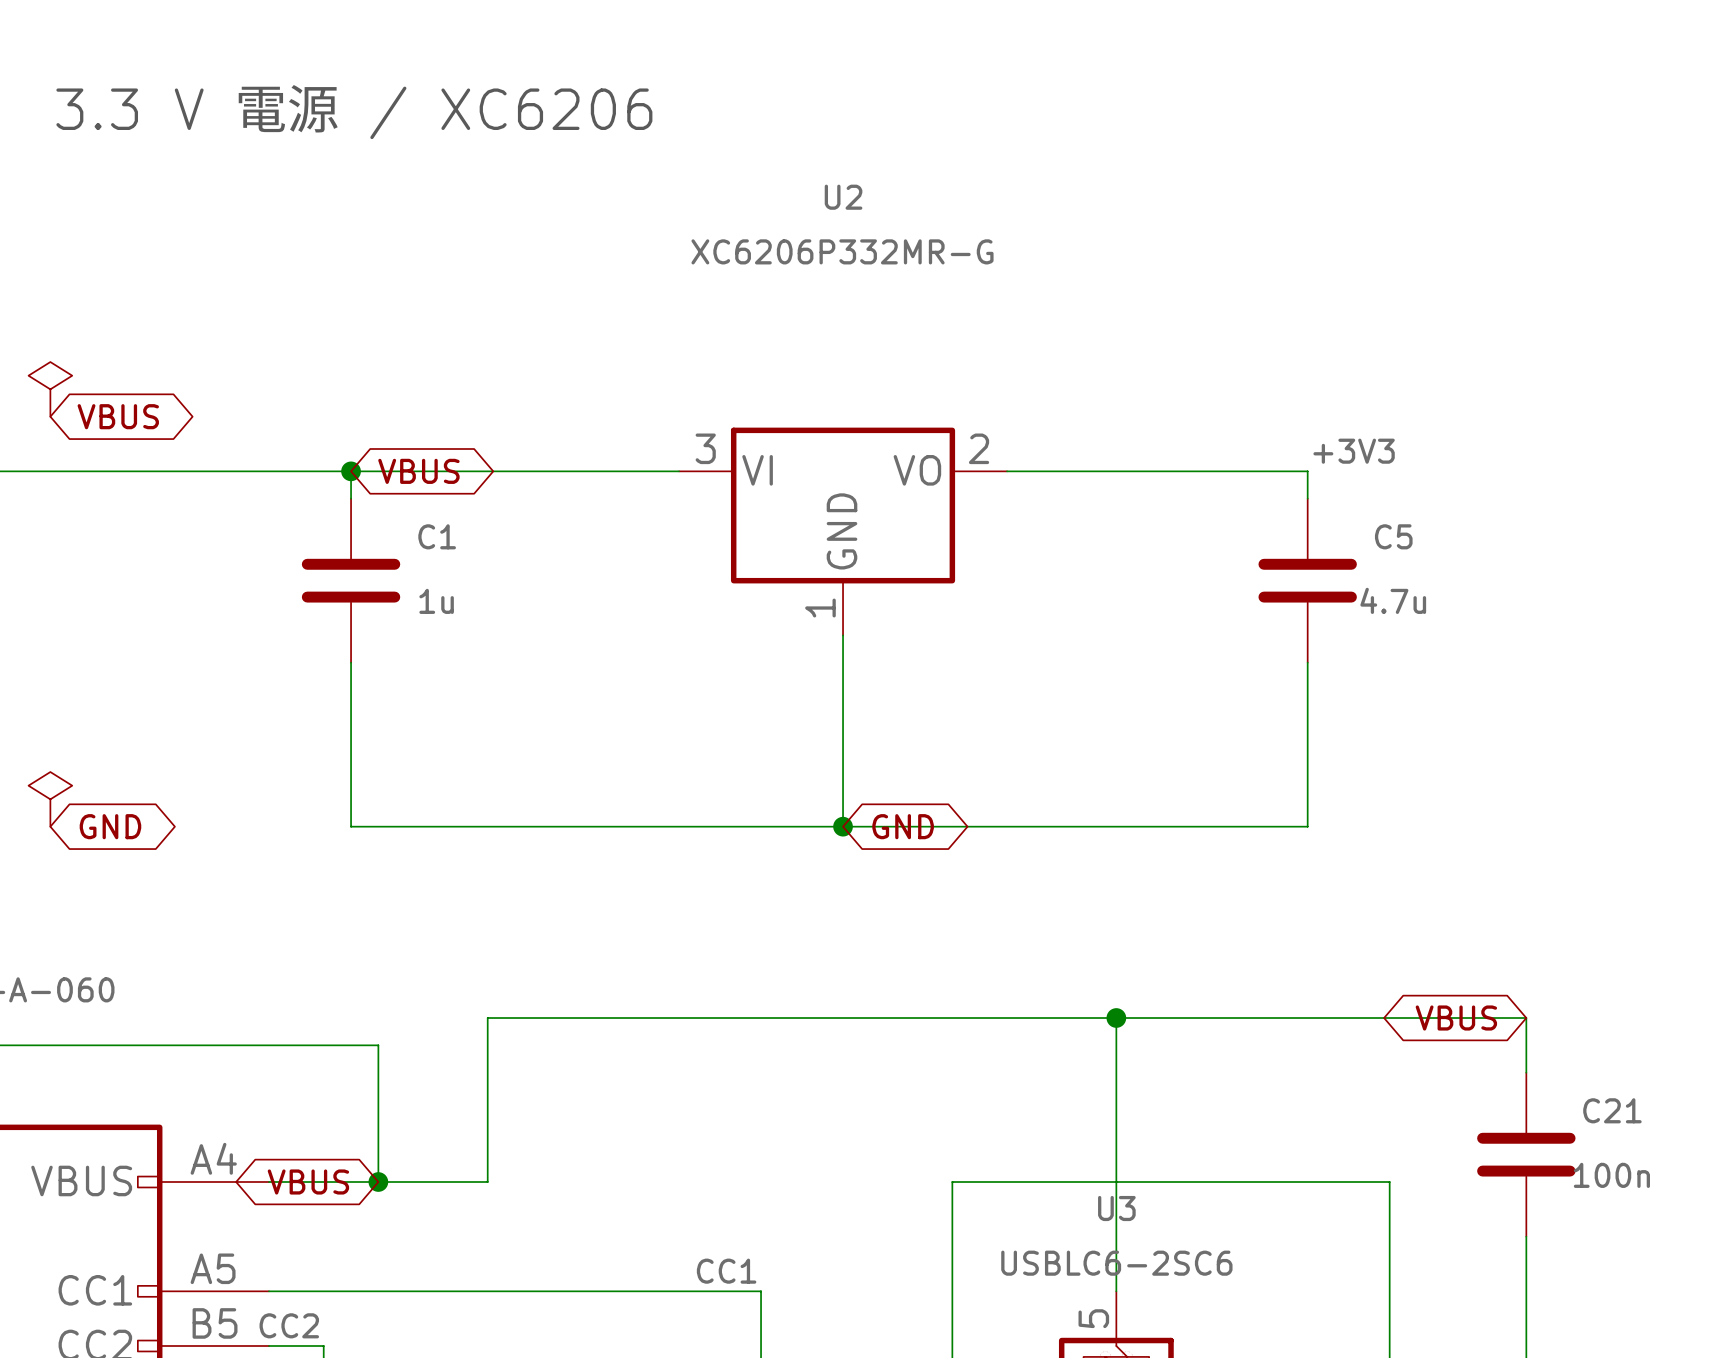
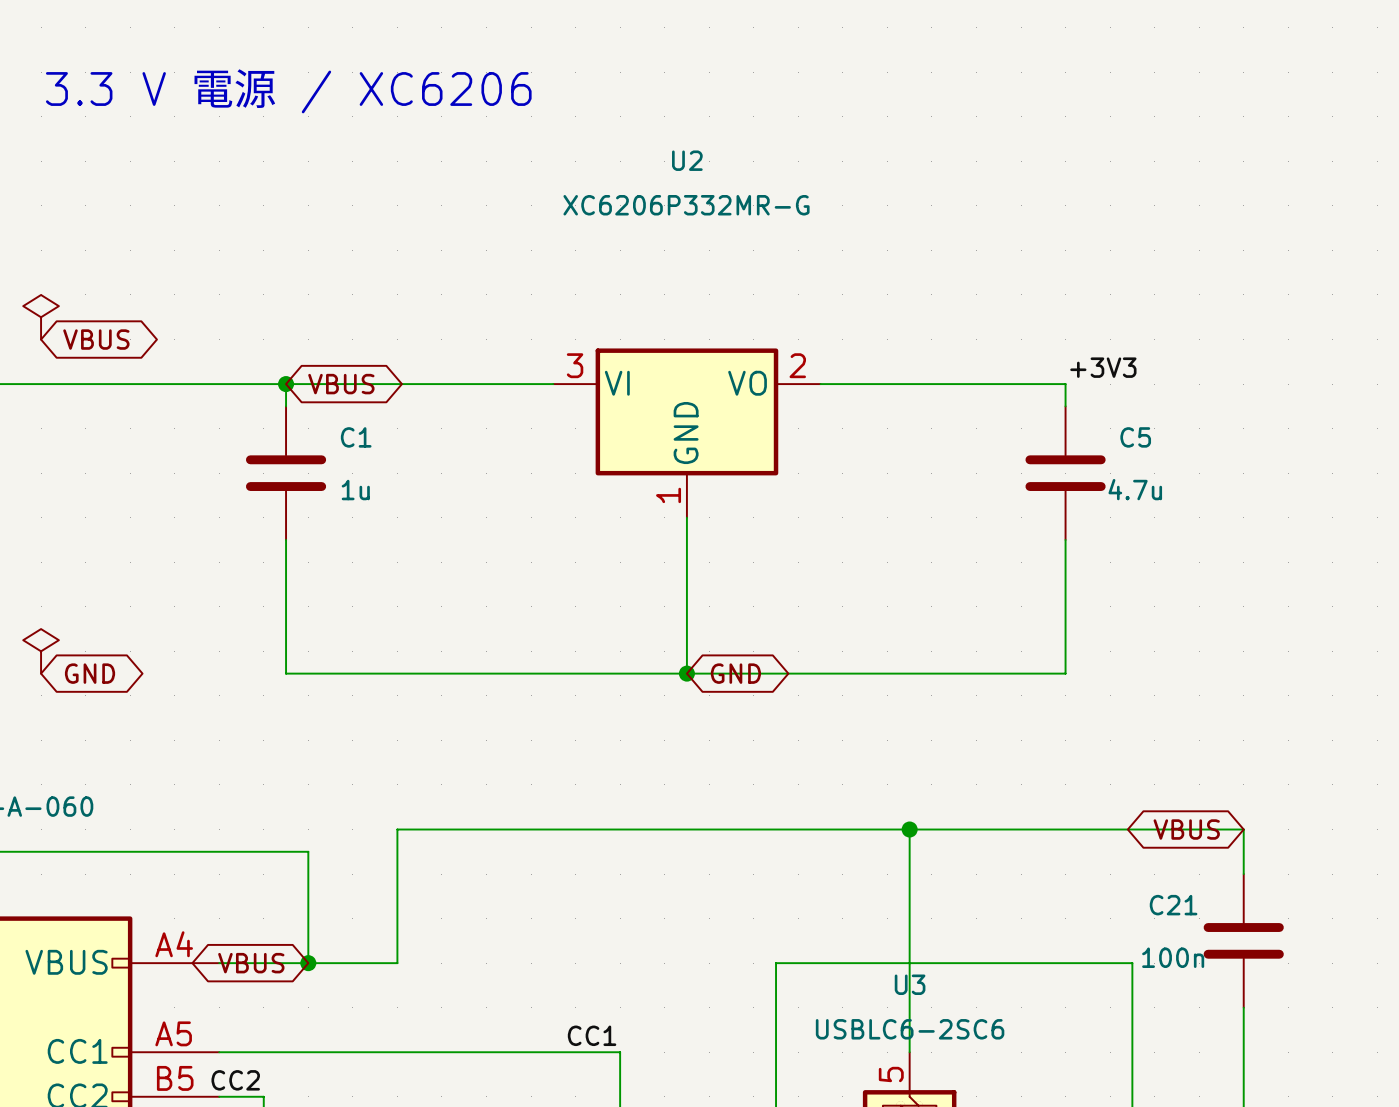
C21 name position: C21 (1612, 1110) -> C21 (1173, 905)
C21 value position: 100n (1611, 1175) -> 100n (1173, 957)

